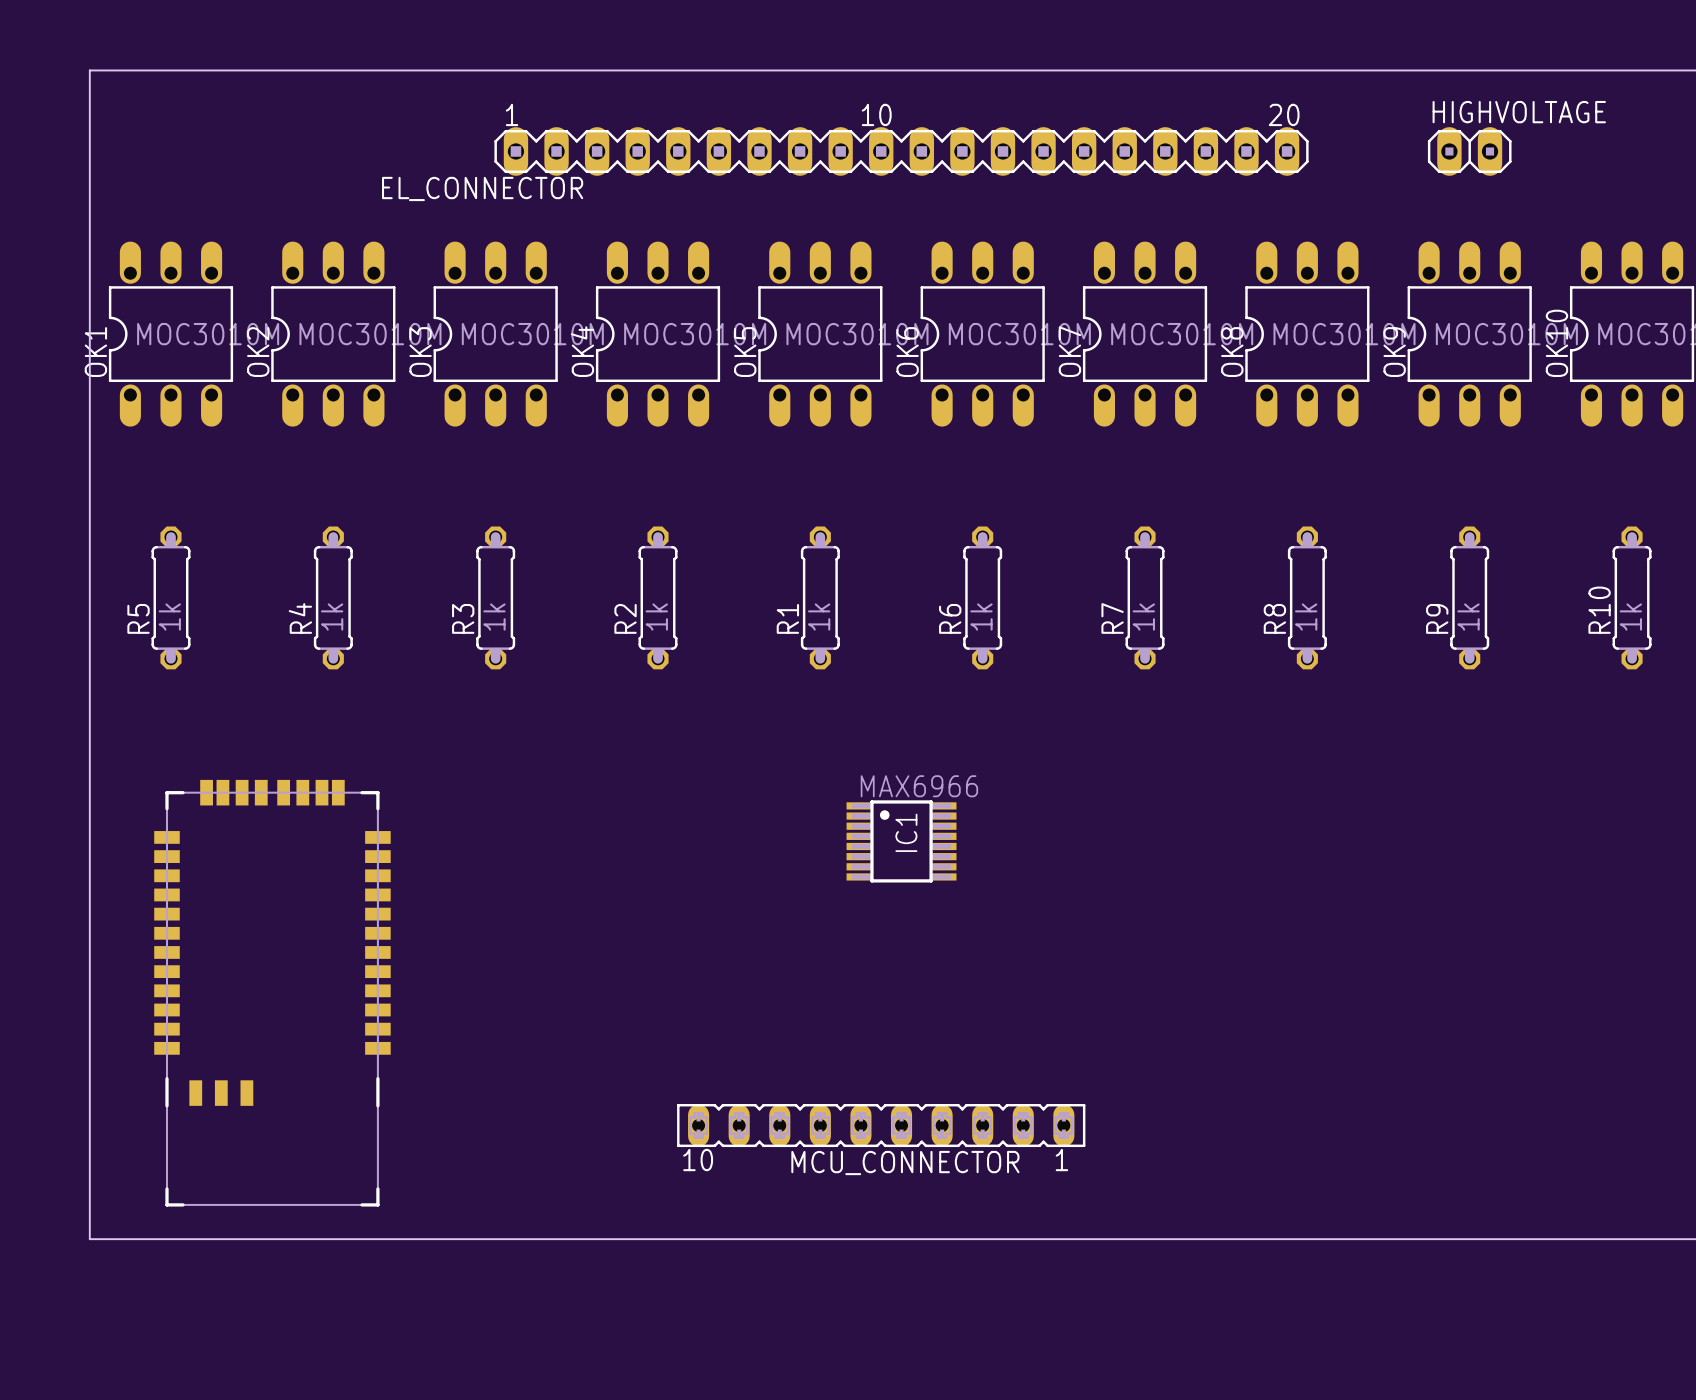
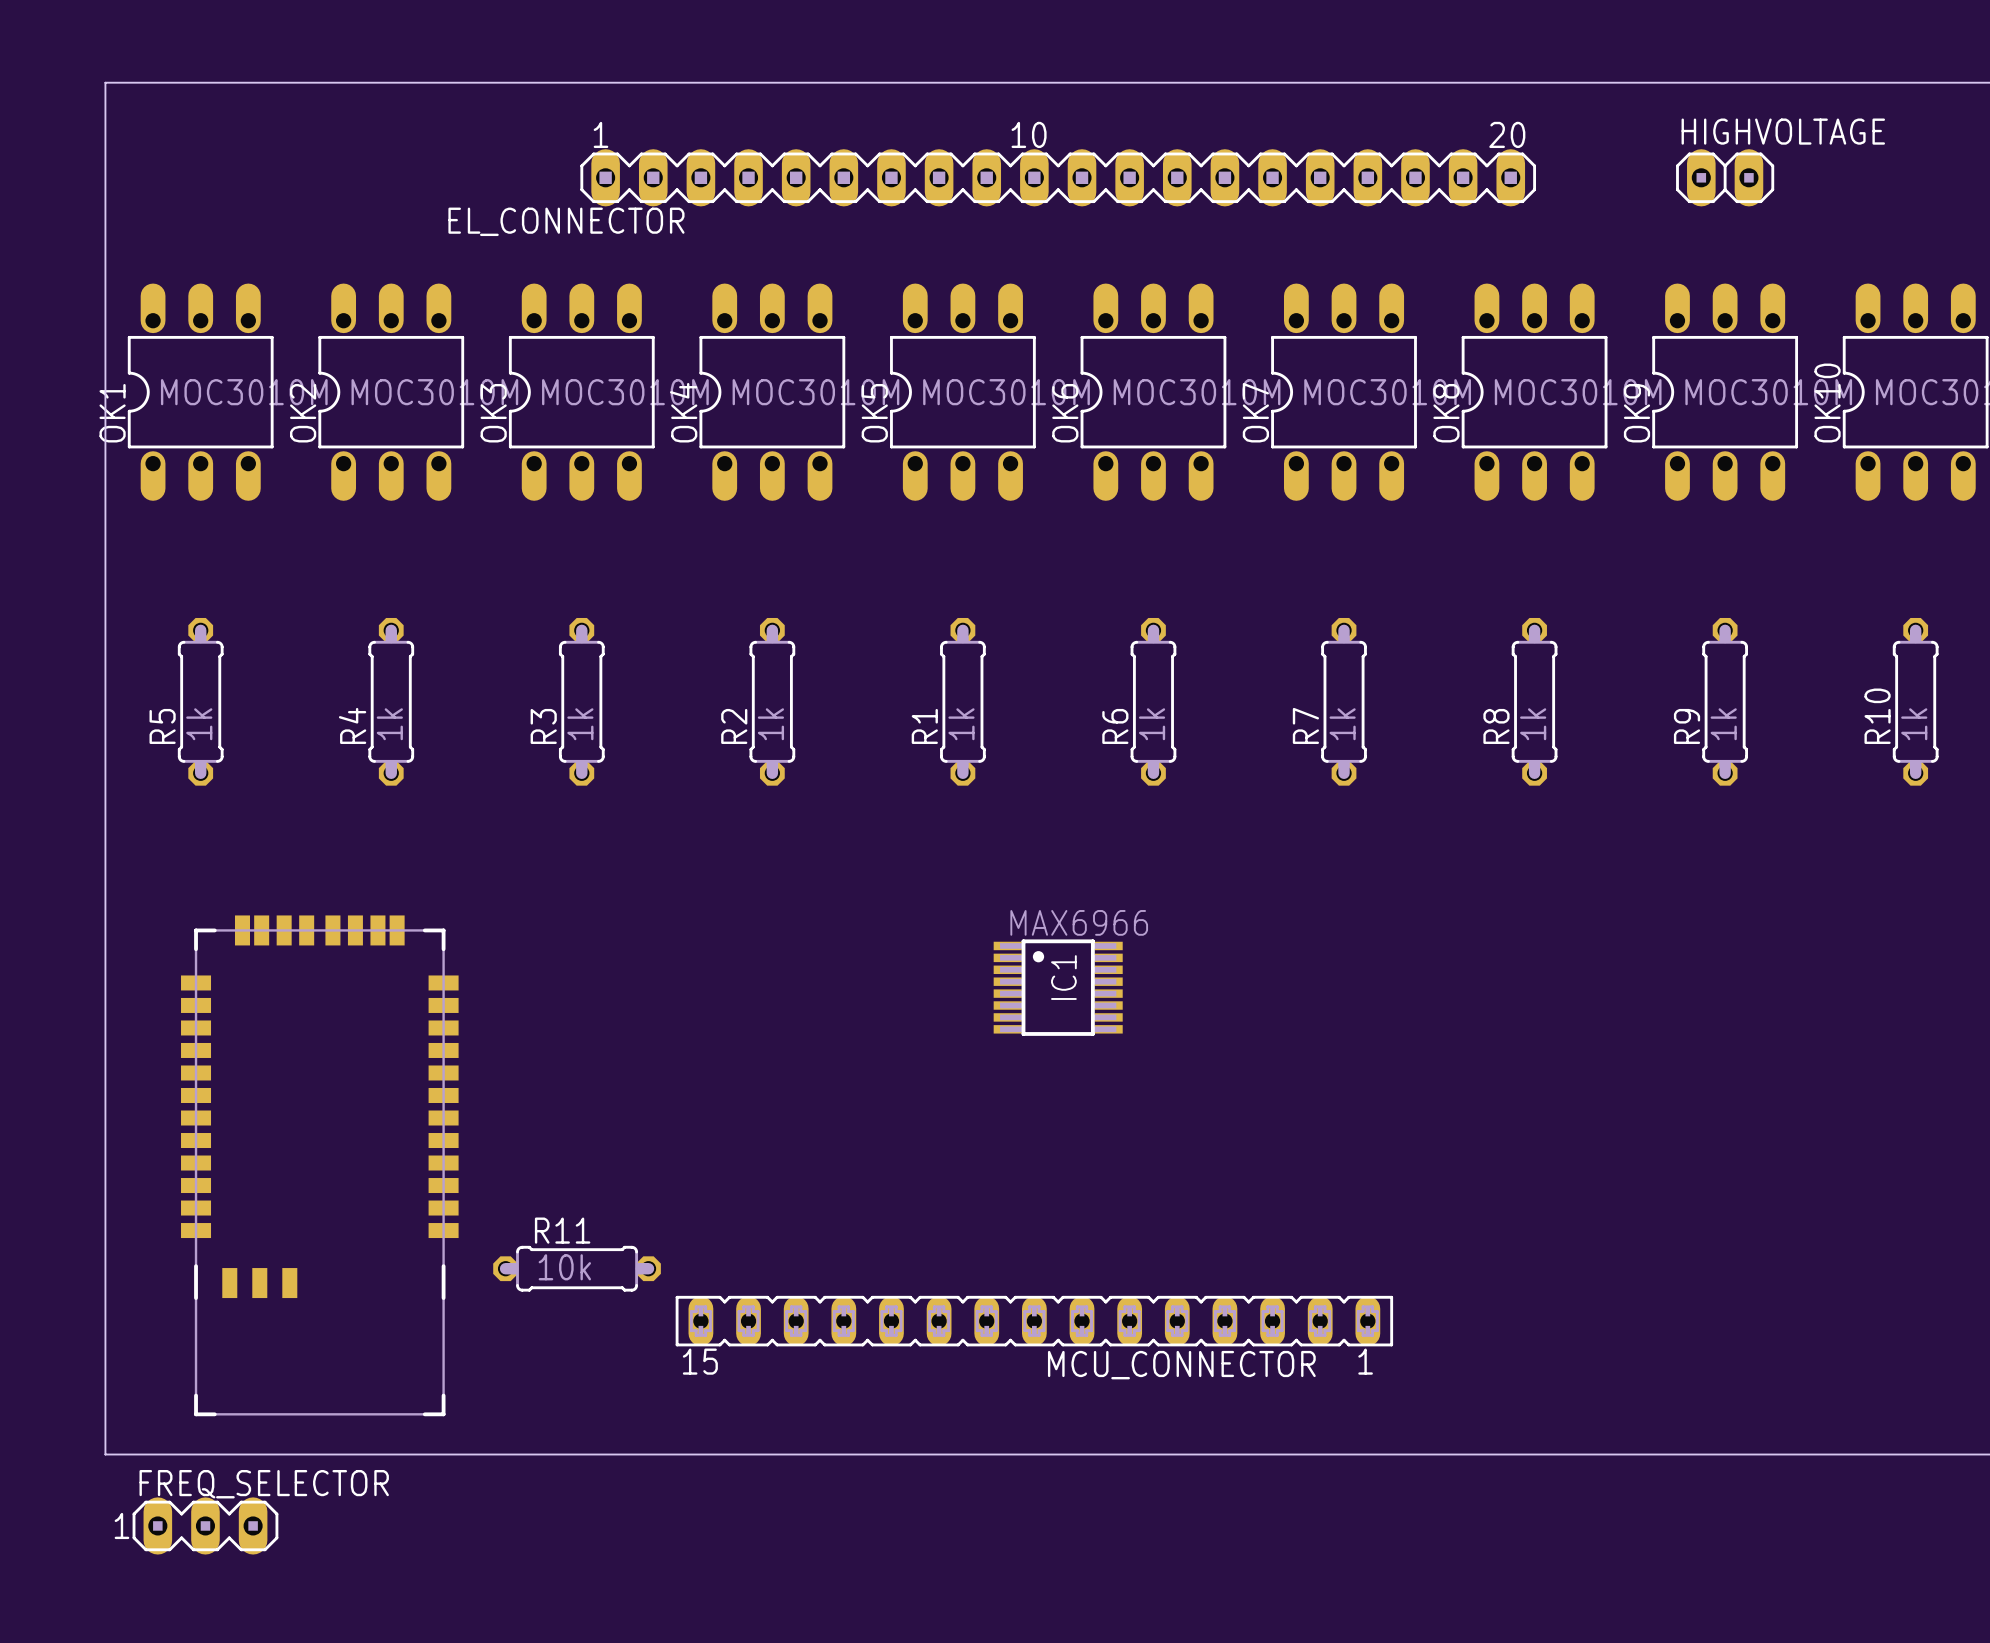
R11: none -> 10k (577, 1268)
MCU_CONNECTOR footprint: [677, 1104, 1086, 1148] -> [675, 1295, 1394, 1347]
MCU_CONNECTOR name position: MCU_CONNECTOR (905, 1163) -> MCU_CONNECTOR (1181, 1365)
FREQ_SELECTOR: none -> (205, 1525)

